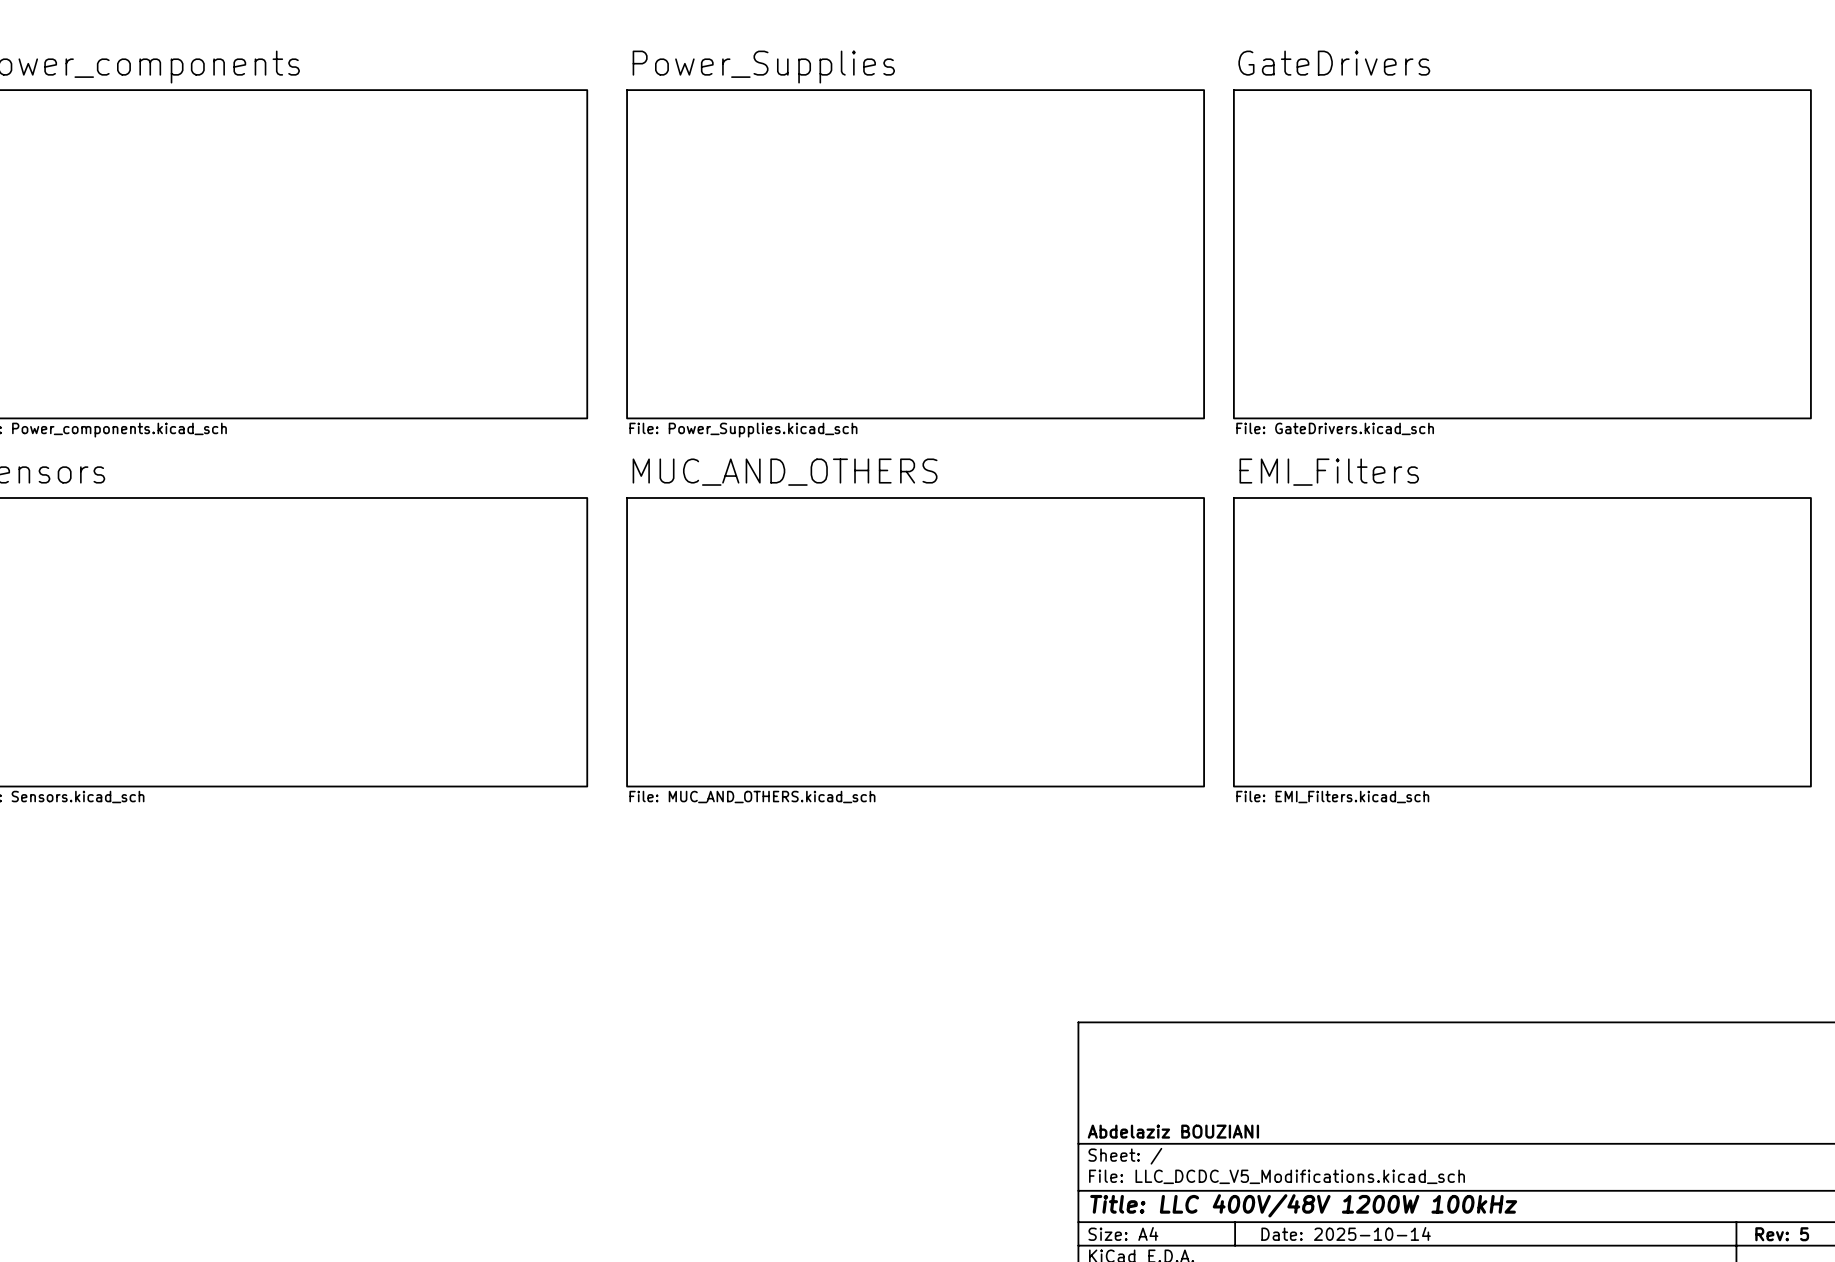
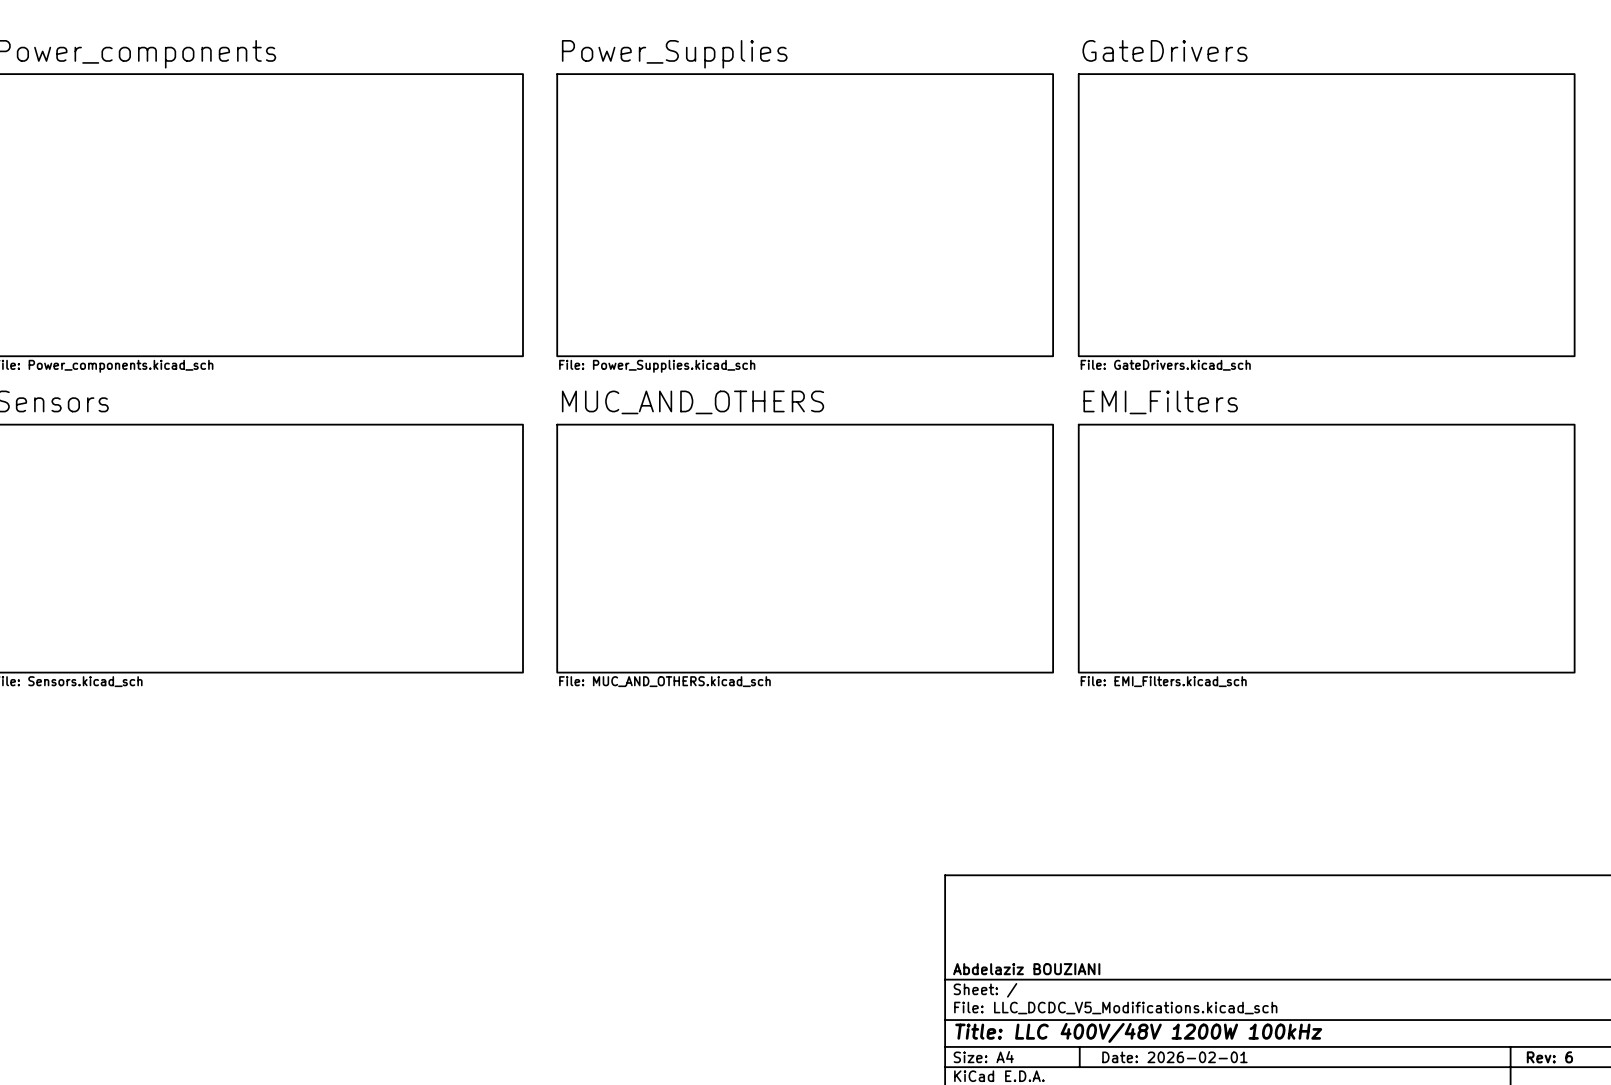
title block: Date: 2025-10-14 (1346, 1233) -> Date: 2026-02-01 (1174, 1057)
title block: Rev: 5 (1782, 1234) -> Rev: 6 (1549, 1057)

